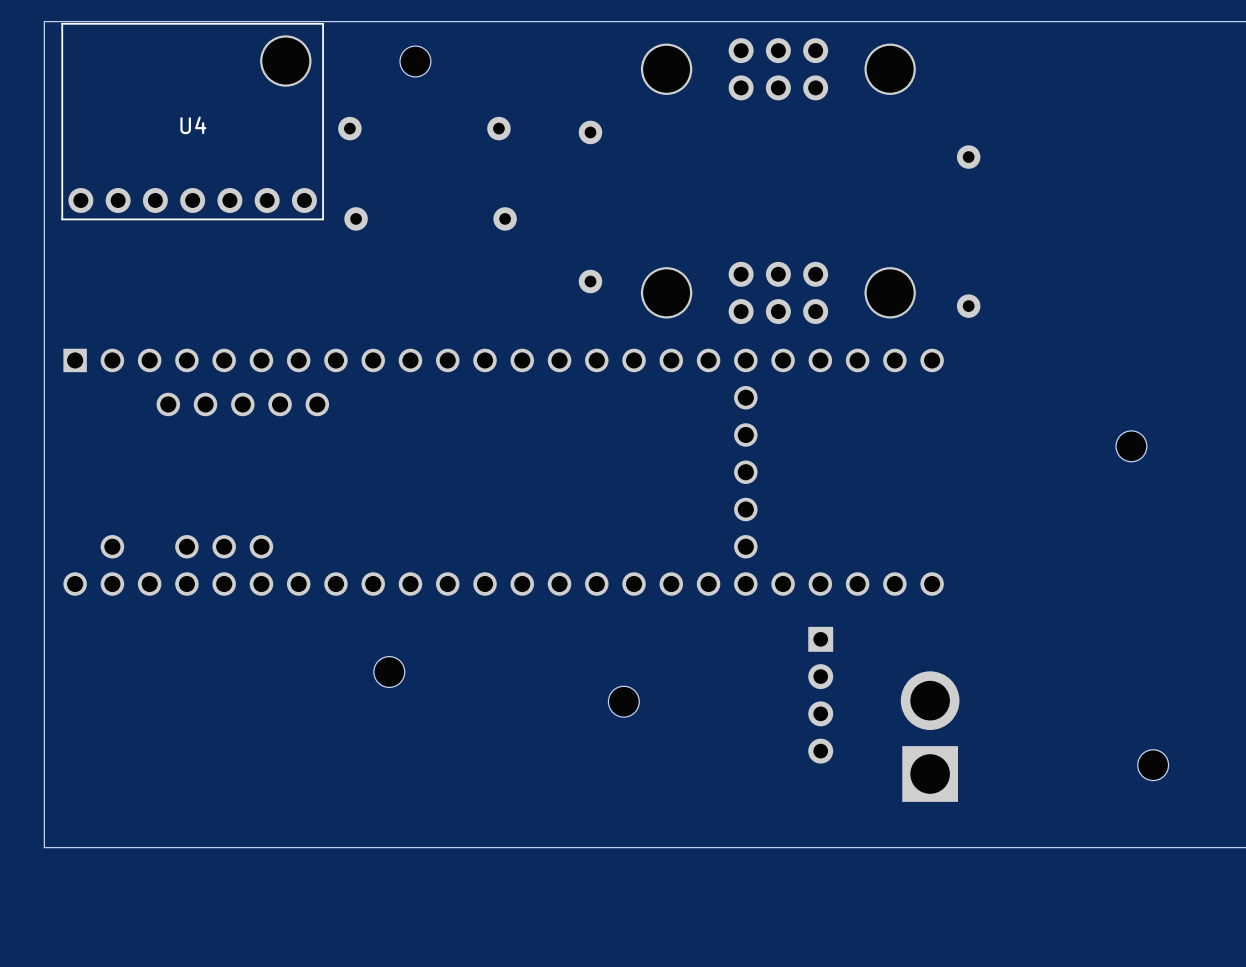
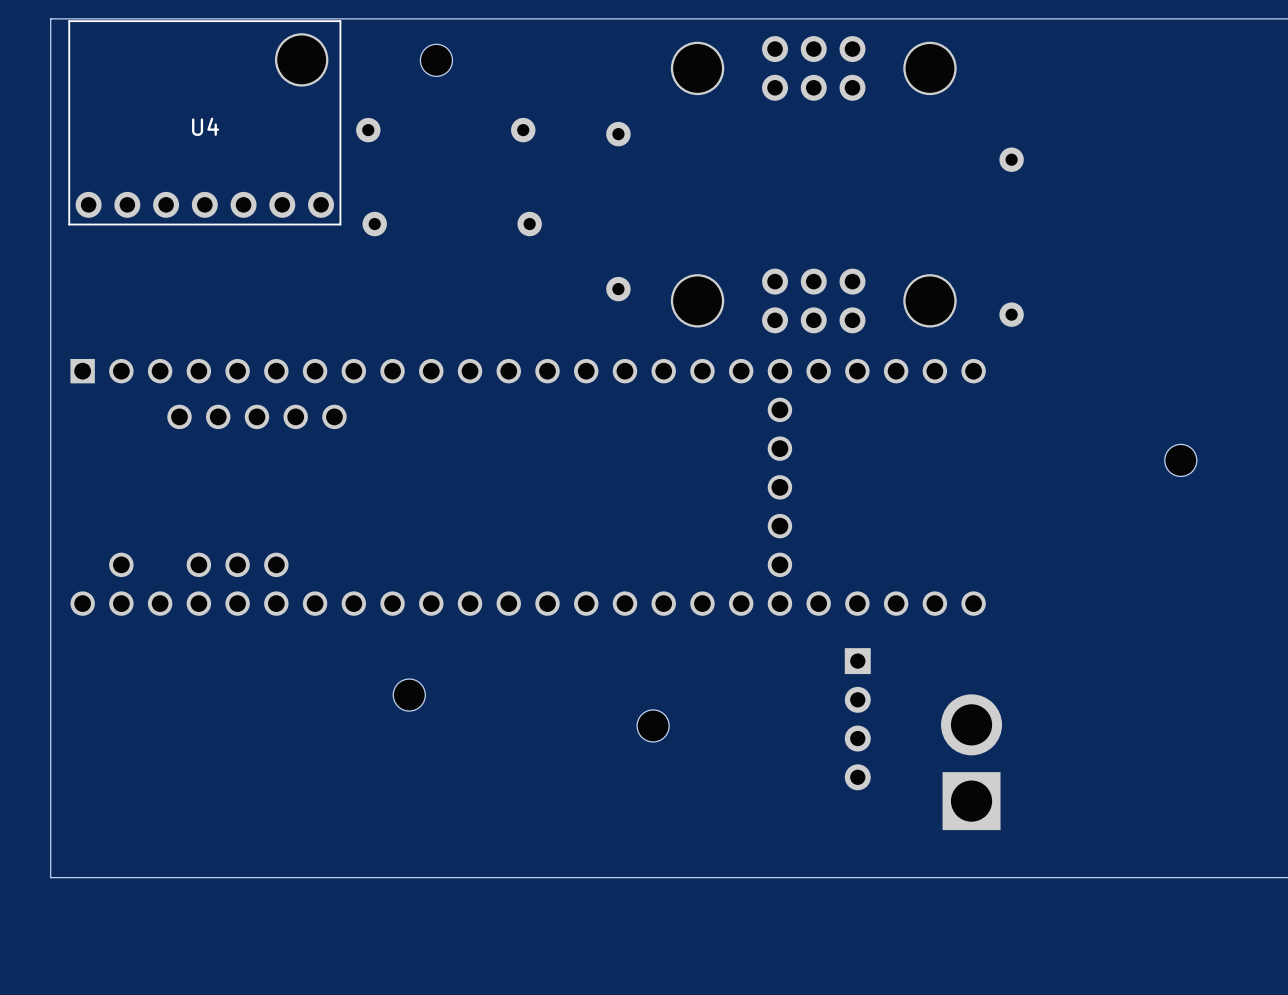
part: (1153, 765) -> none

